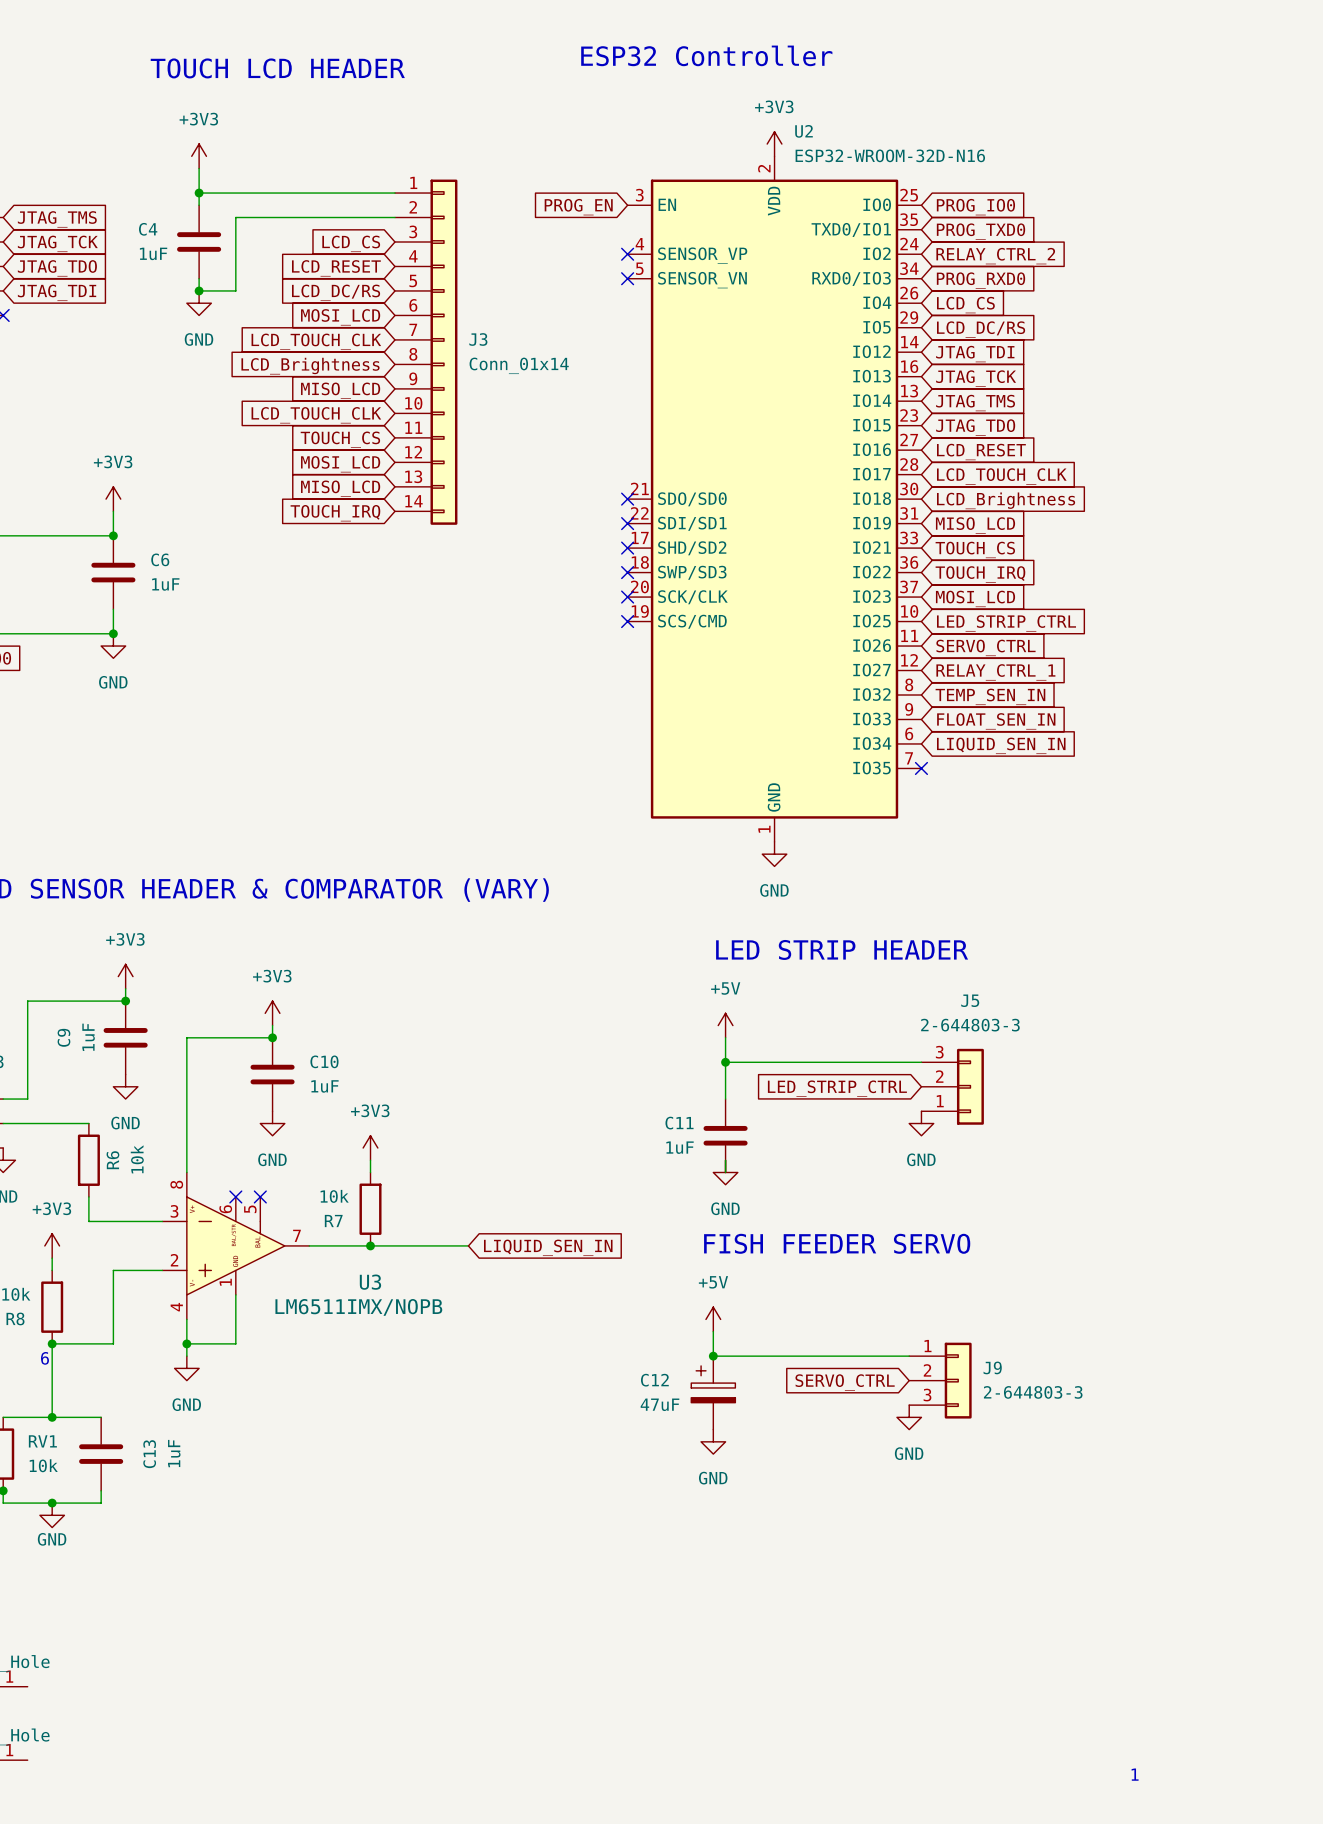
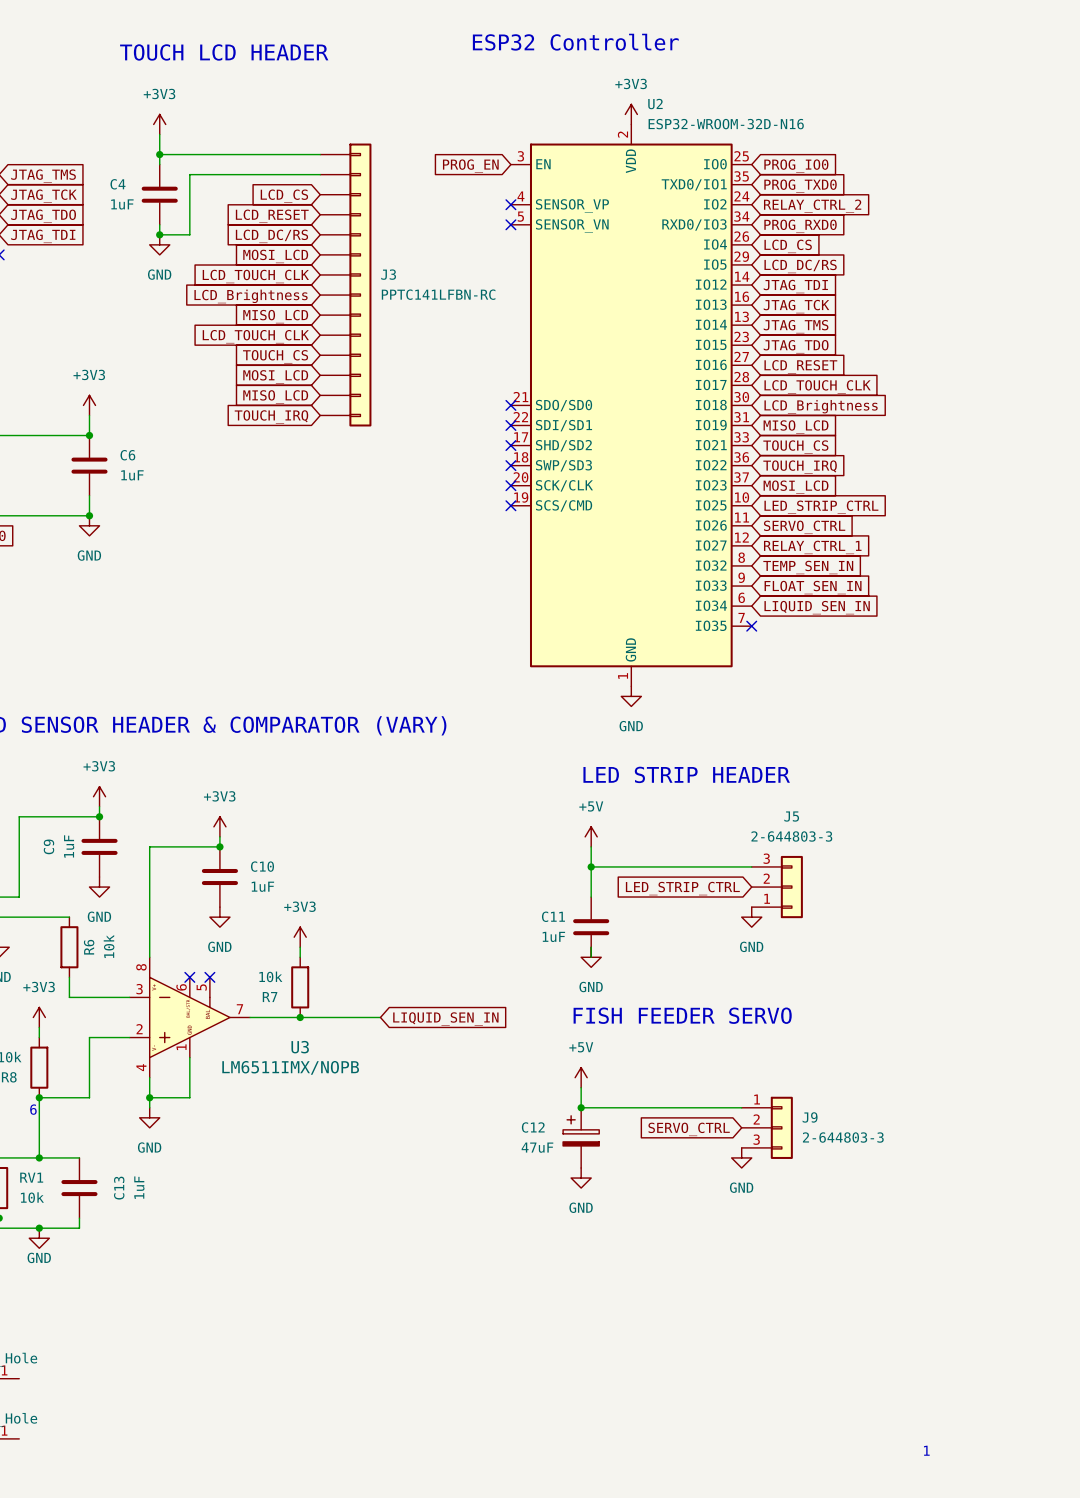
J3 symbol: [394, 179, 458, 525] -> [320, 143, 372, 427]
J3 value: Conn_01x14 (519, 365) -> PPTC141LFBN-RC (438, 294)

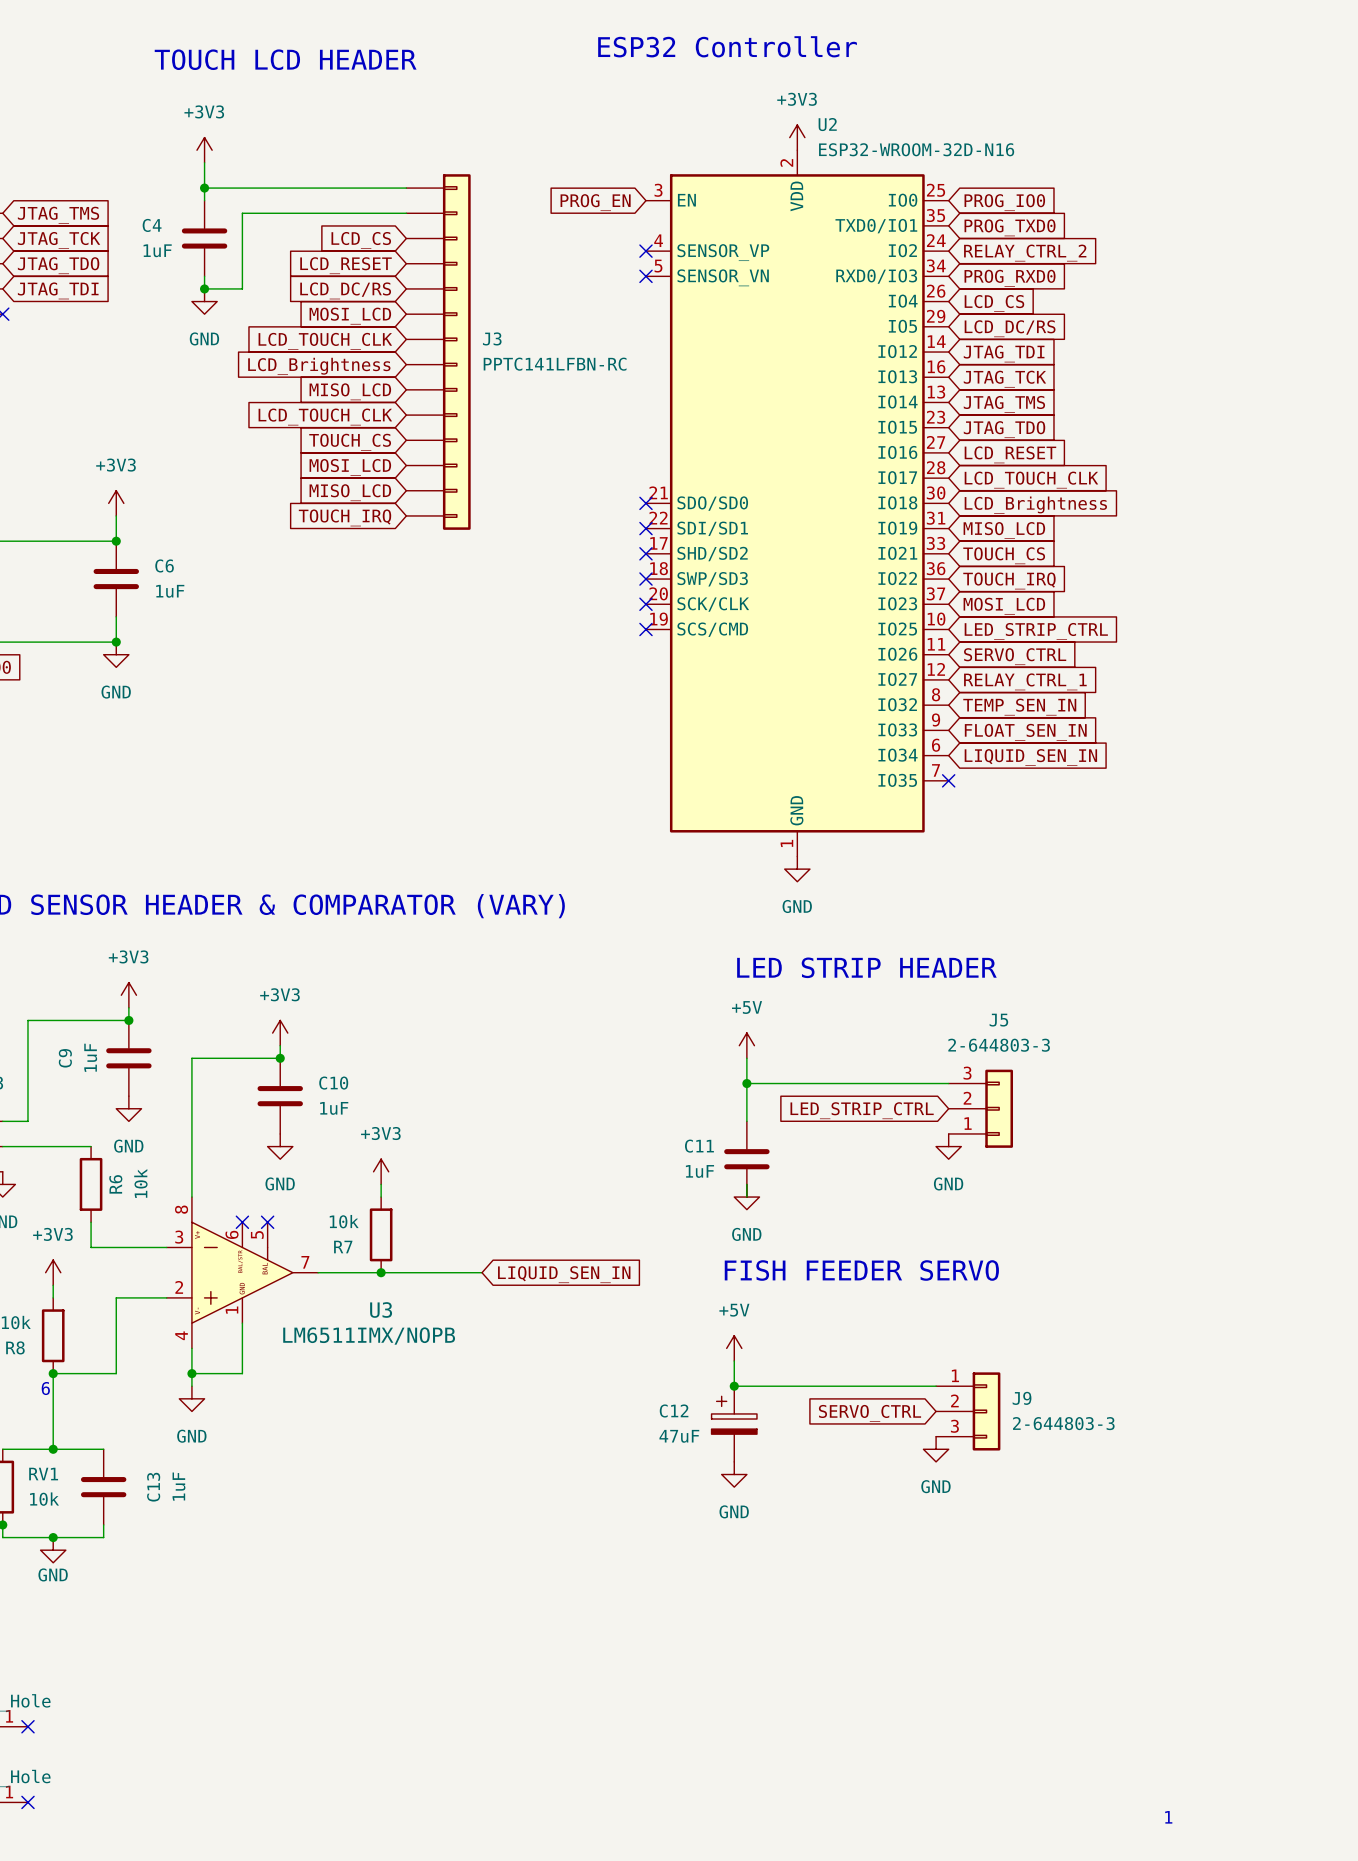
no-connect mark: none -> (27, 1726)
no-connect mark: none -> (27, 1802)

